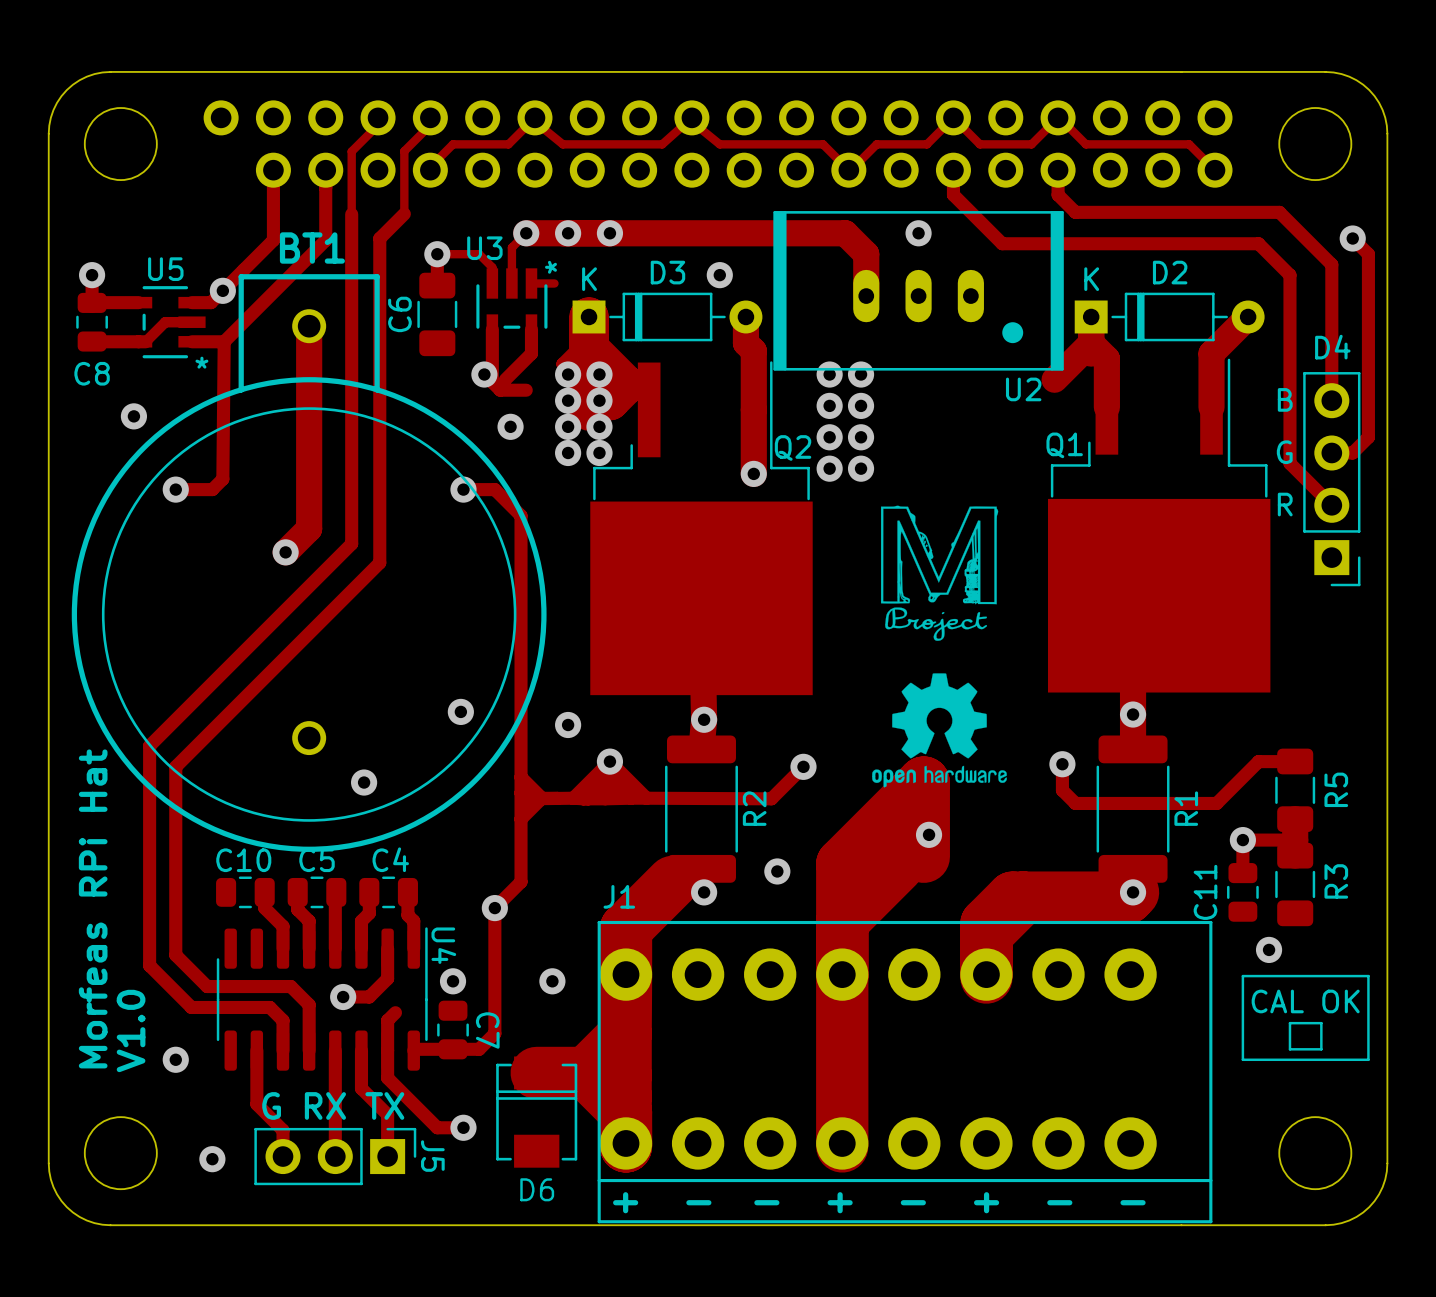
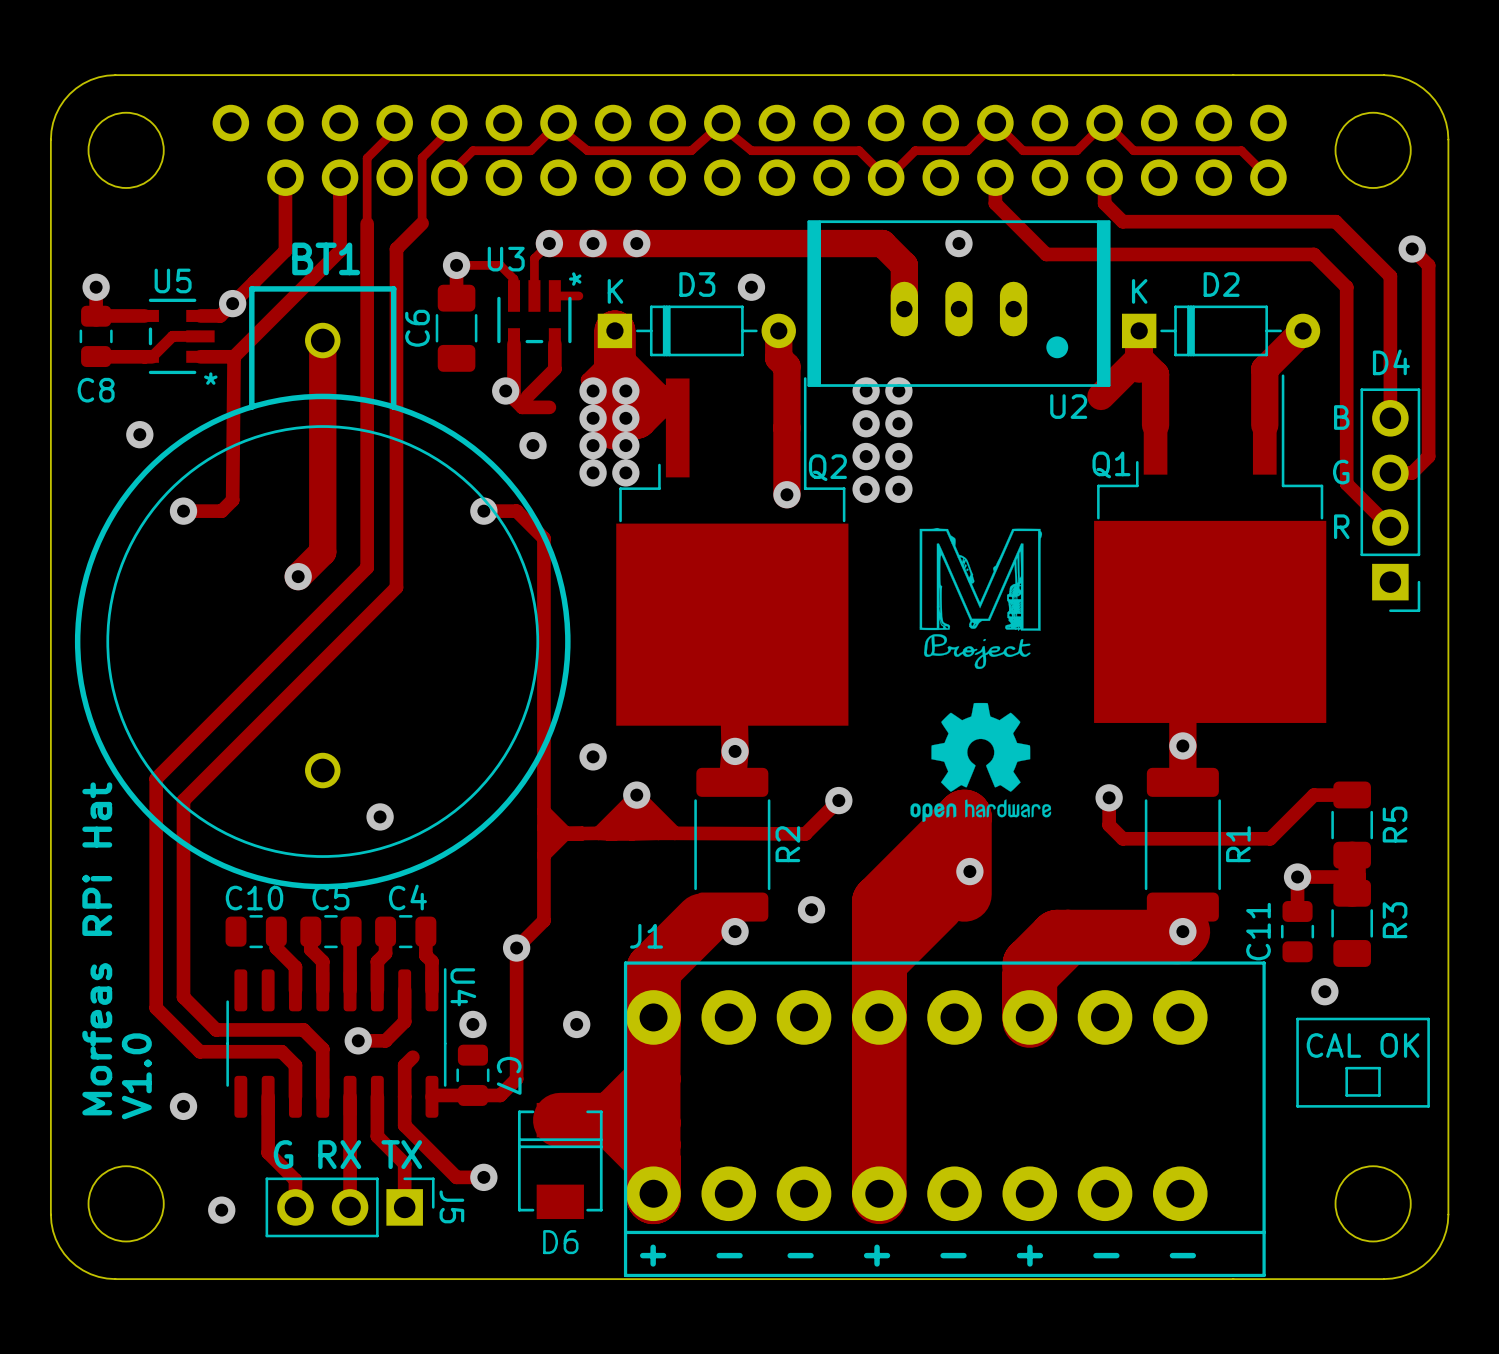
via: (460, 711) -> none

